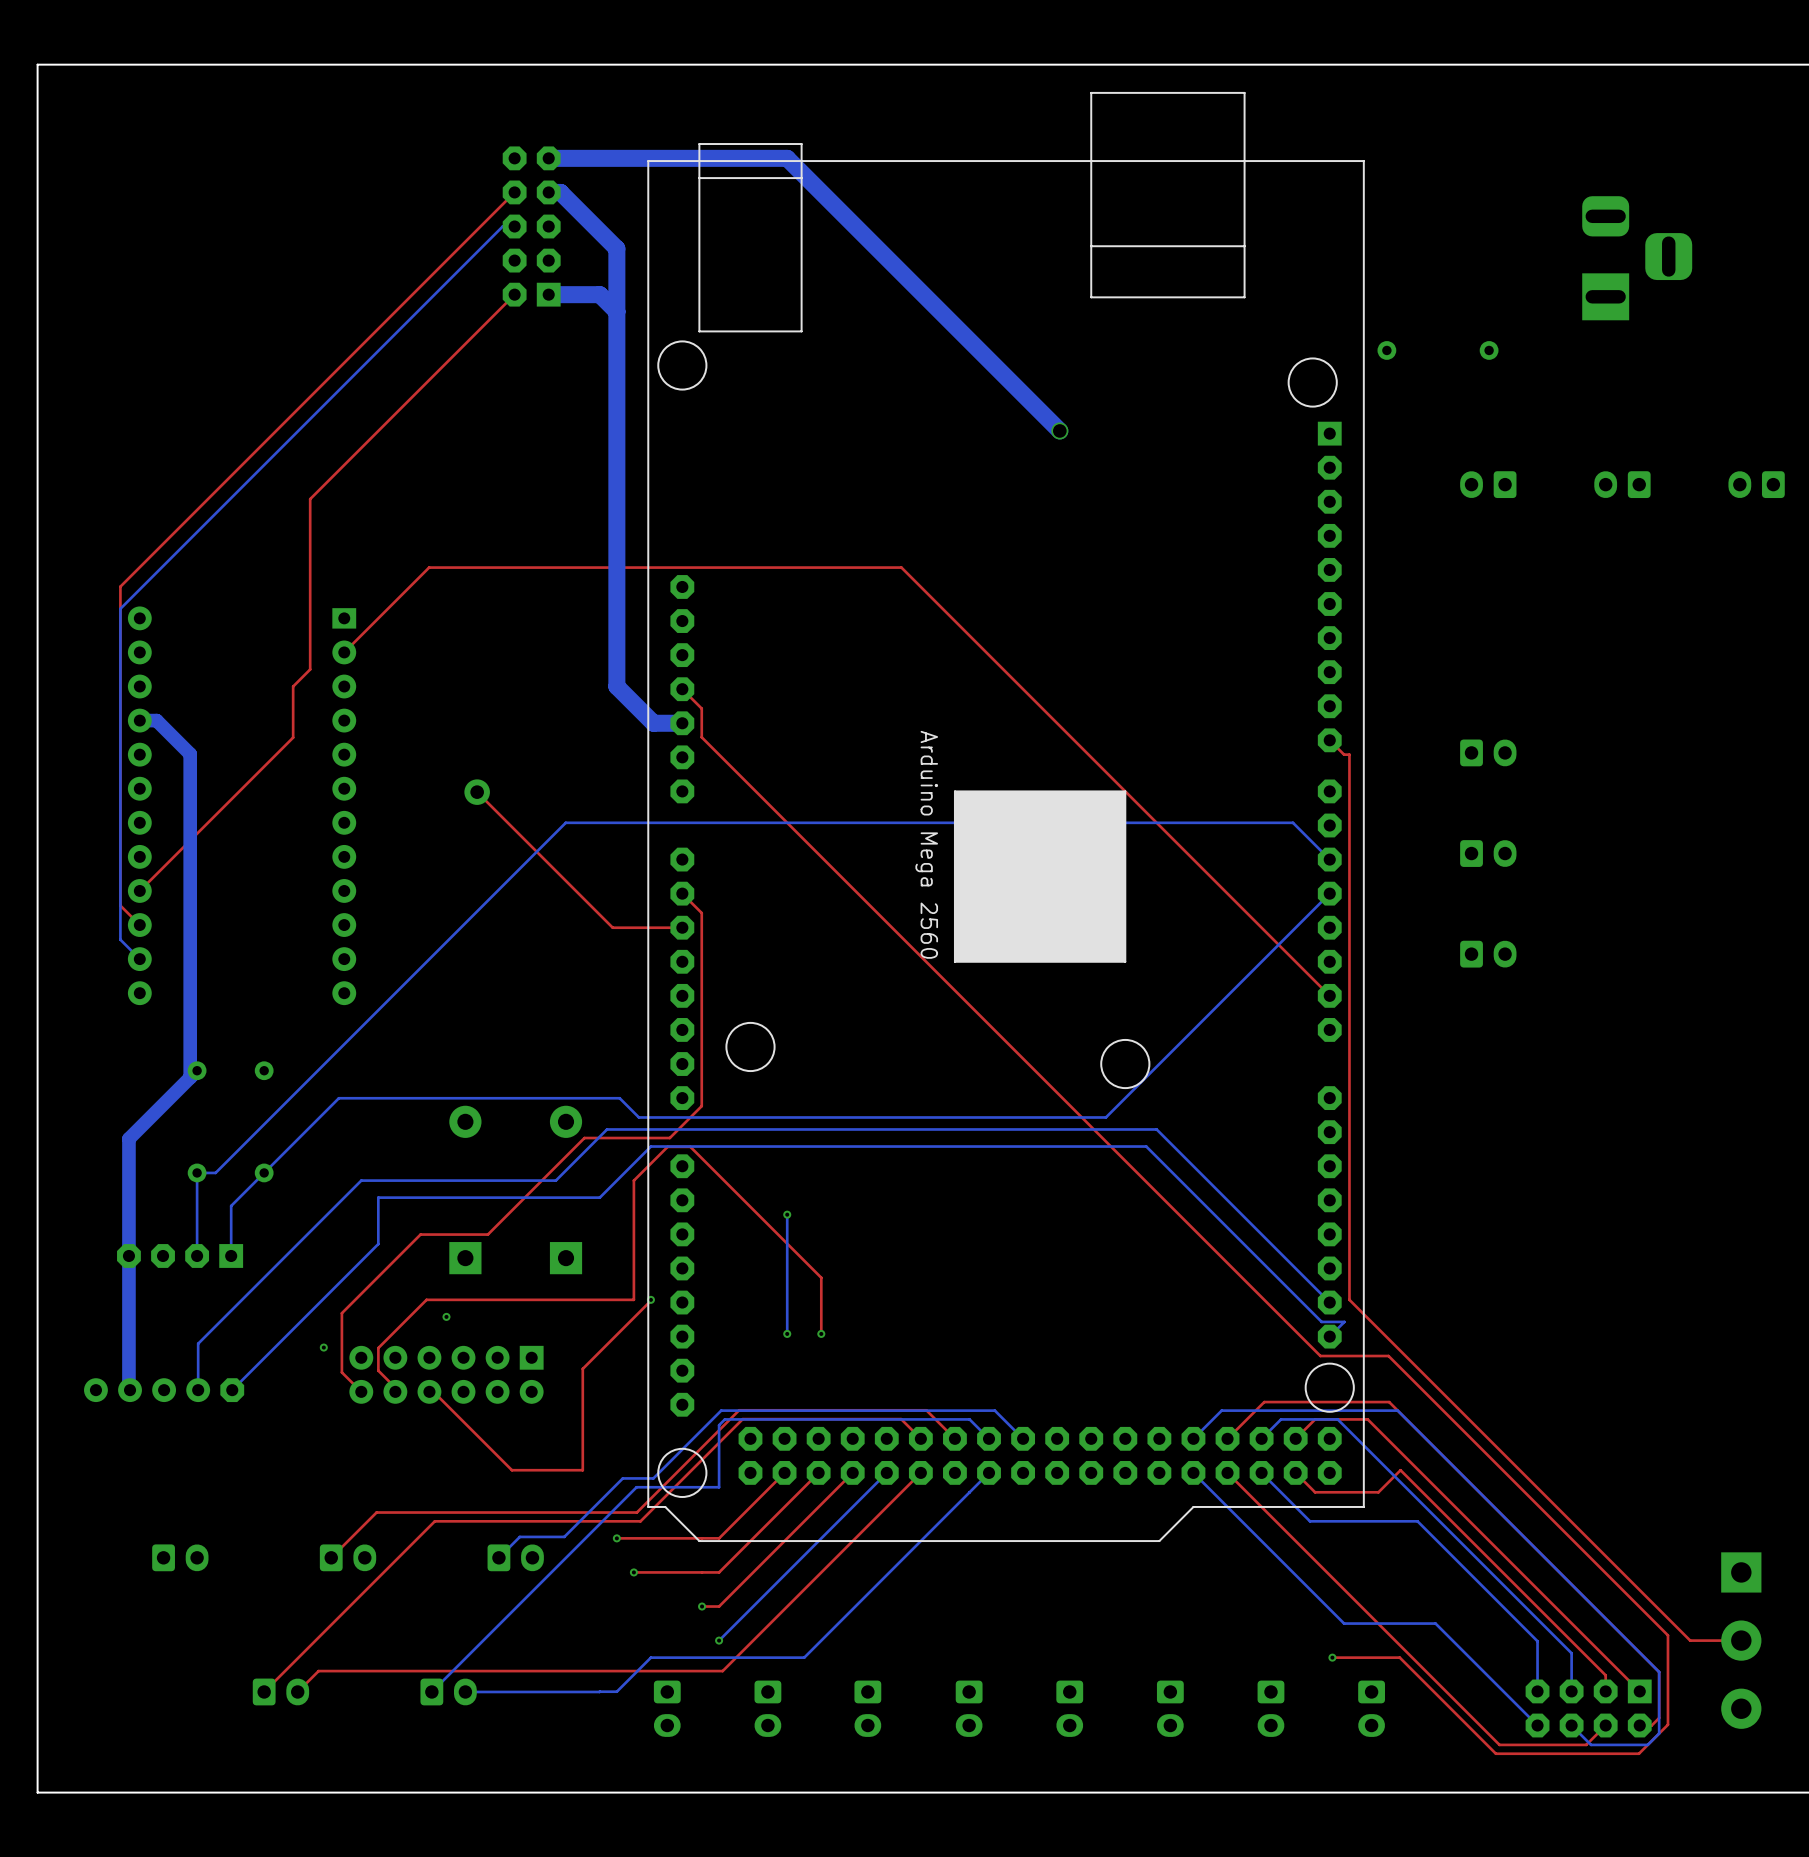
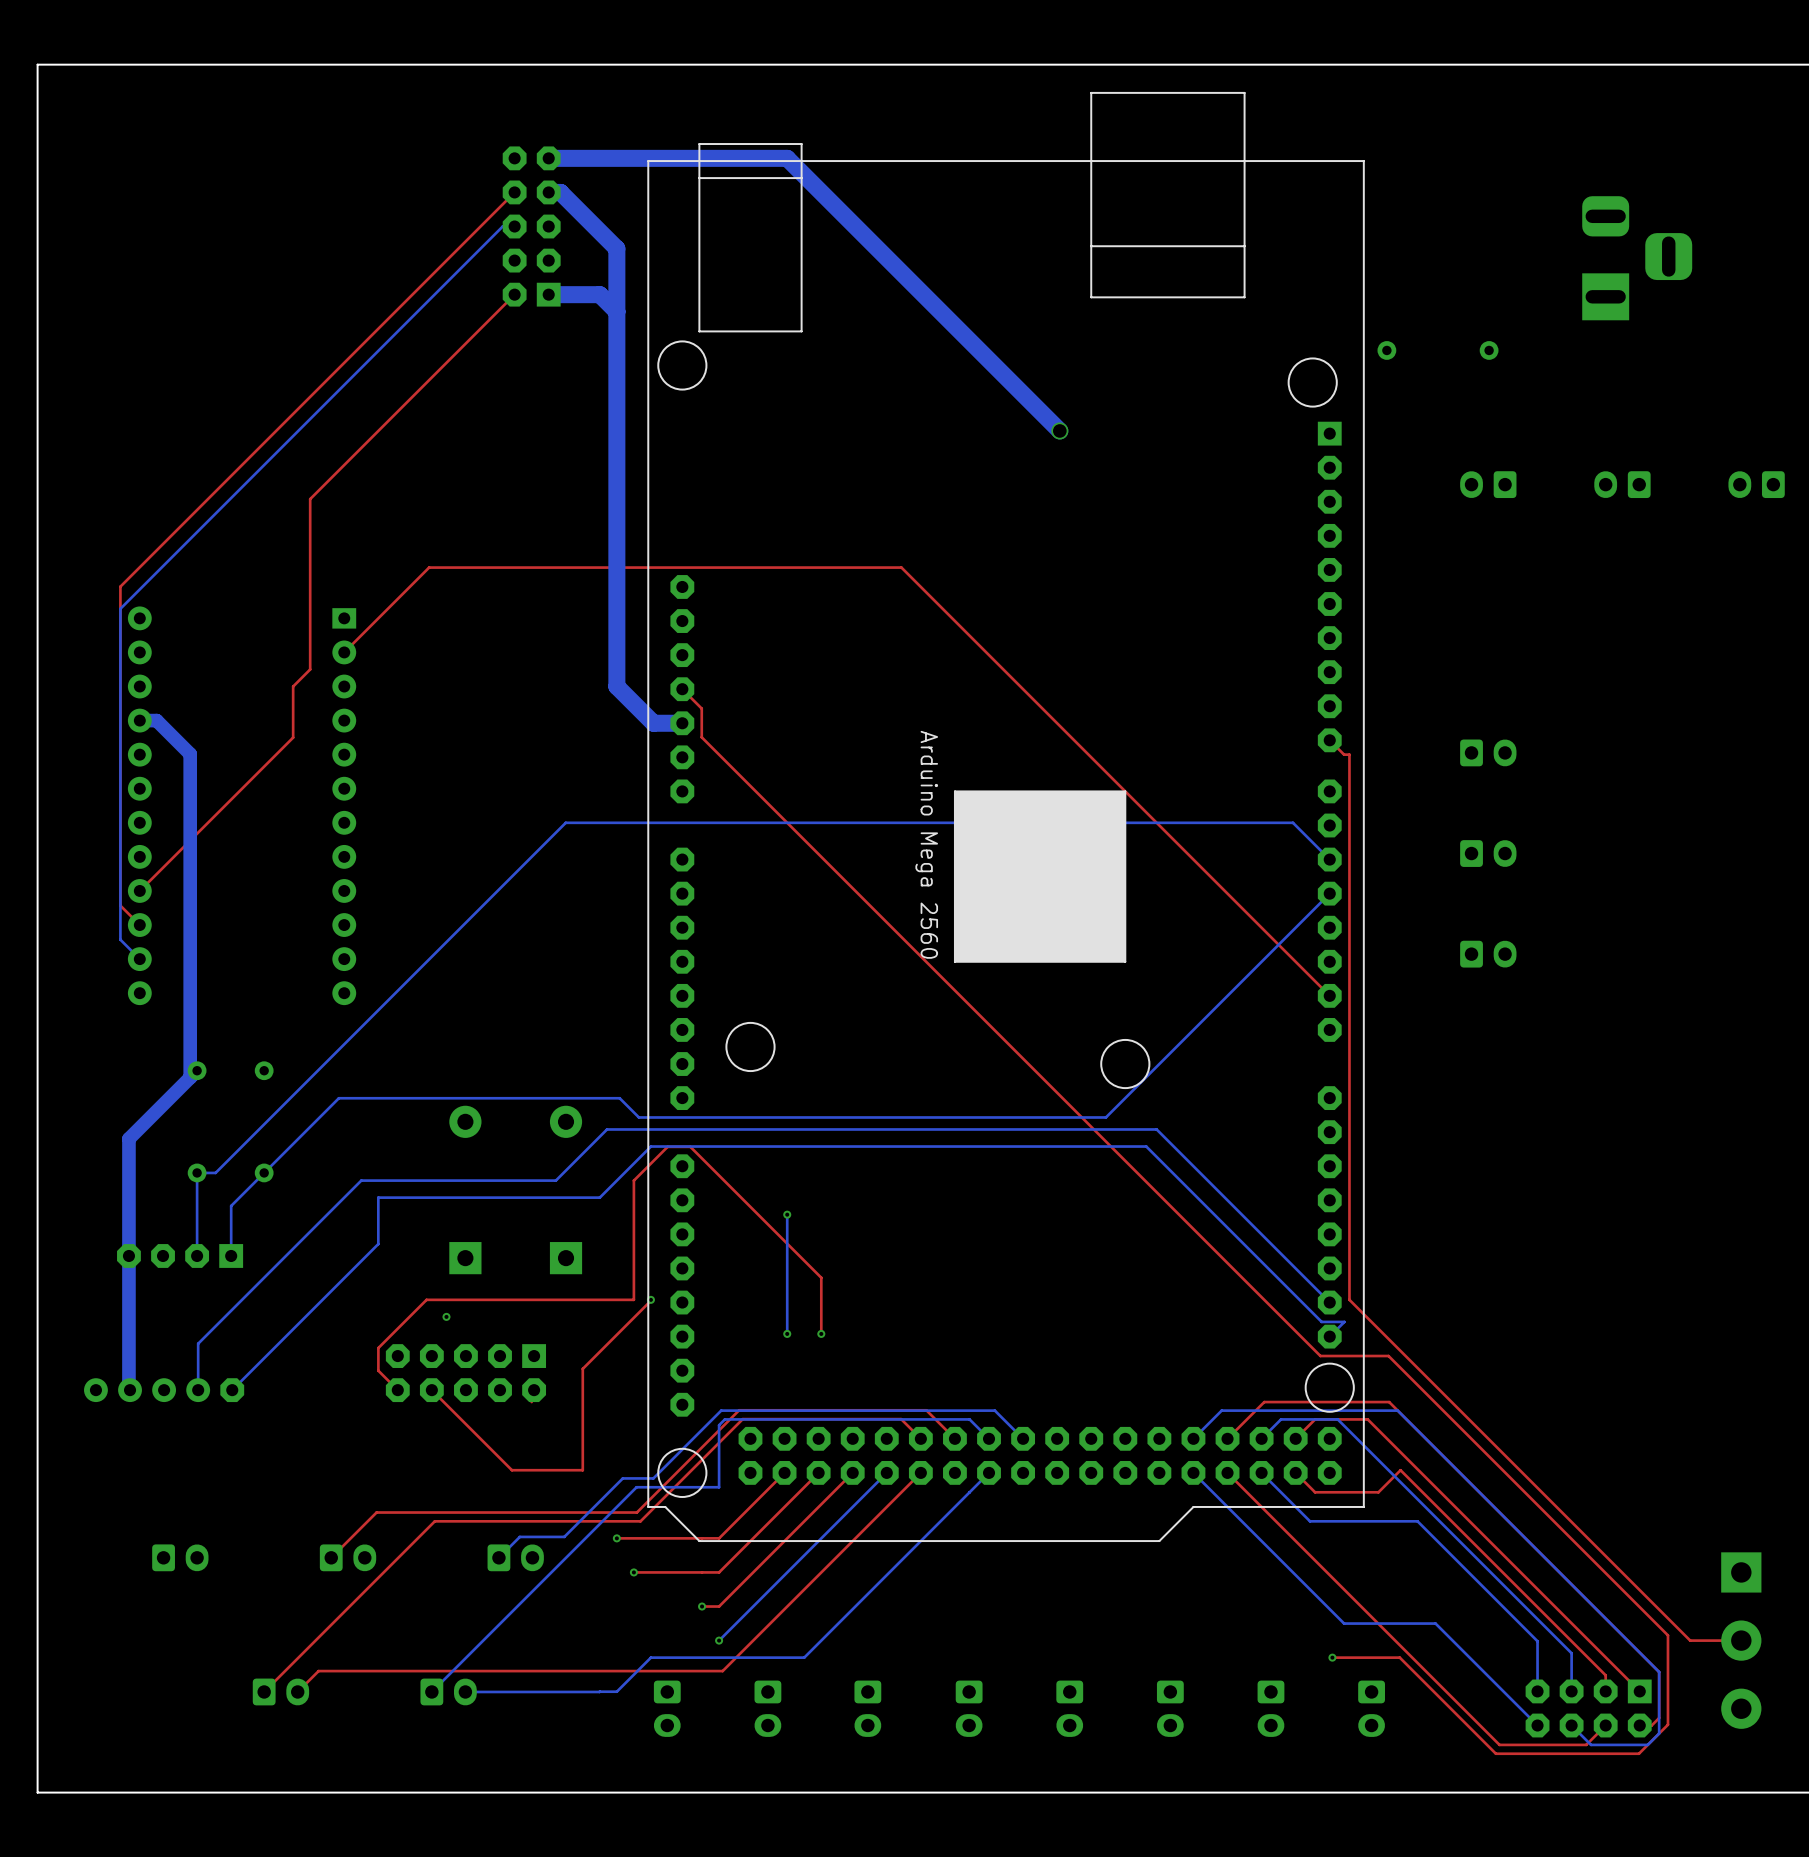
top track: (477, 792) (612, 927) (682, 927) -> none
part: (477, 792) -> none
top track: (682, 893) (701, 913) (701, 1106) (669, 1138) (584, 1138) (487, 1234) (420, 1234) (341, 1313) (341, 1372) (361, 1391) -> none
via: (323, 1347) -> none
part: none -> (465, 1373)
part: (446, 1374) -> none

